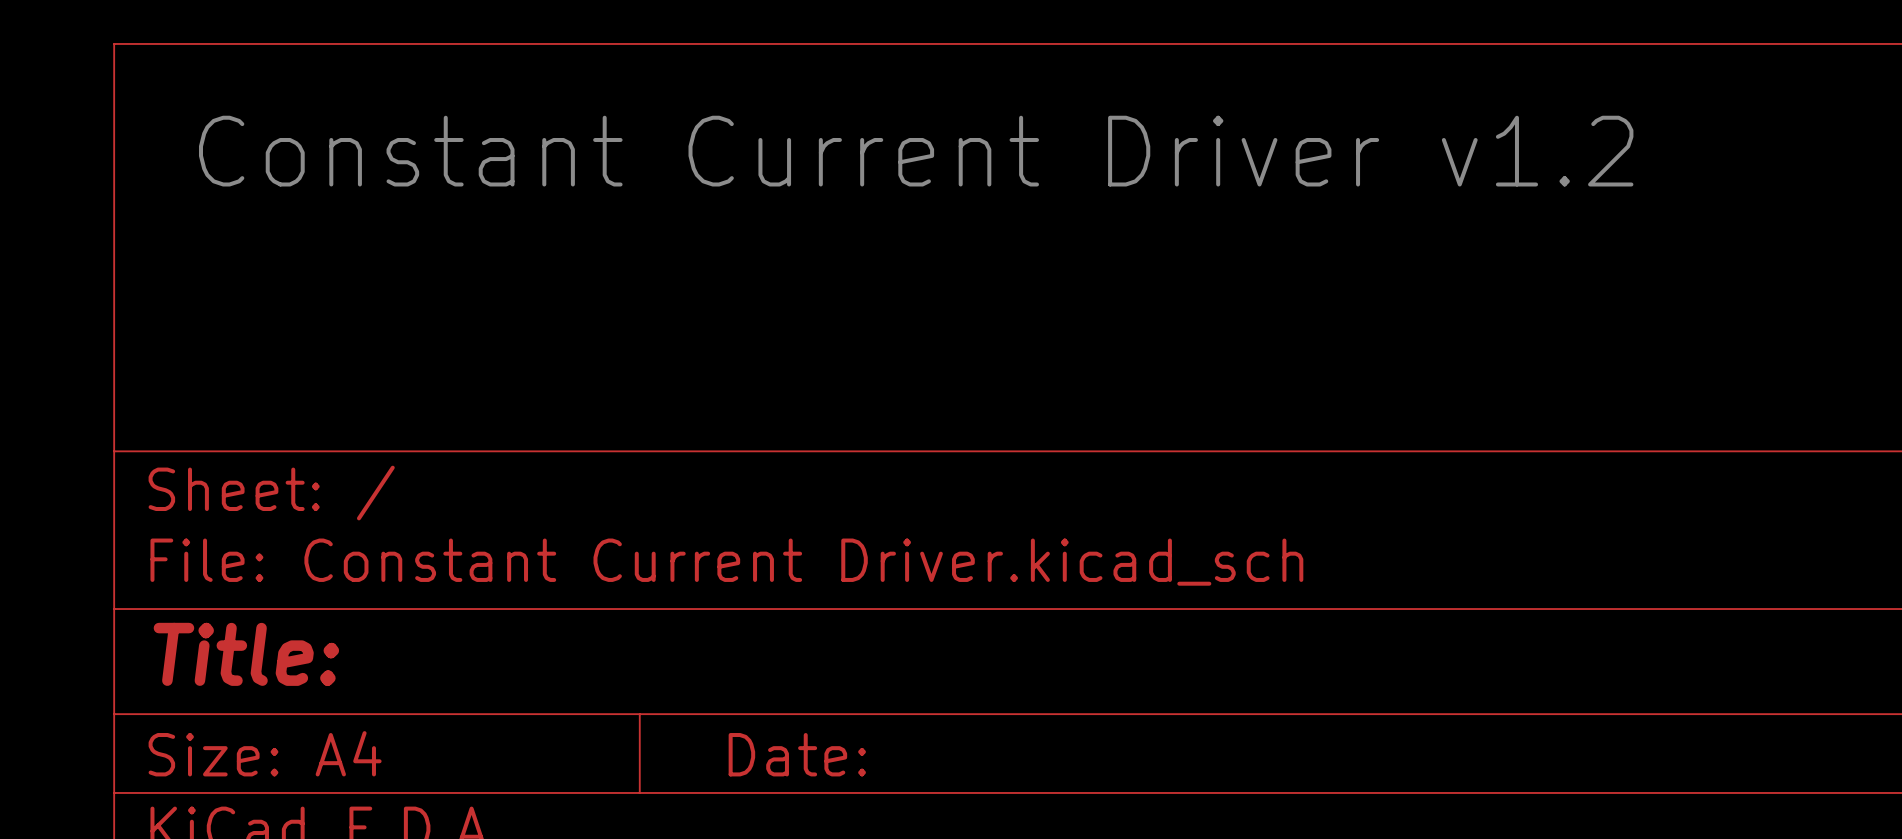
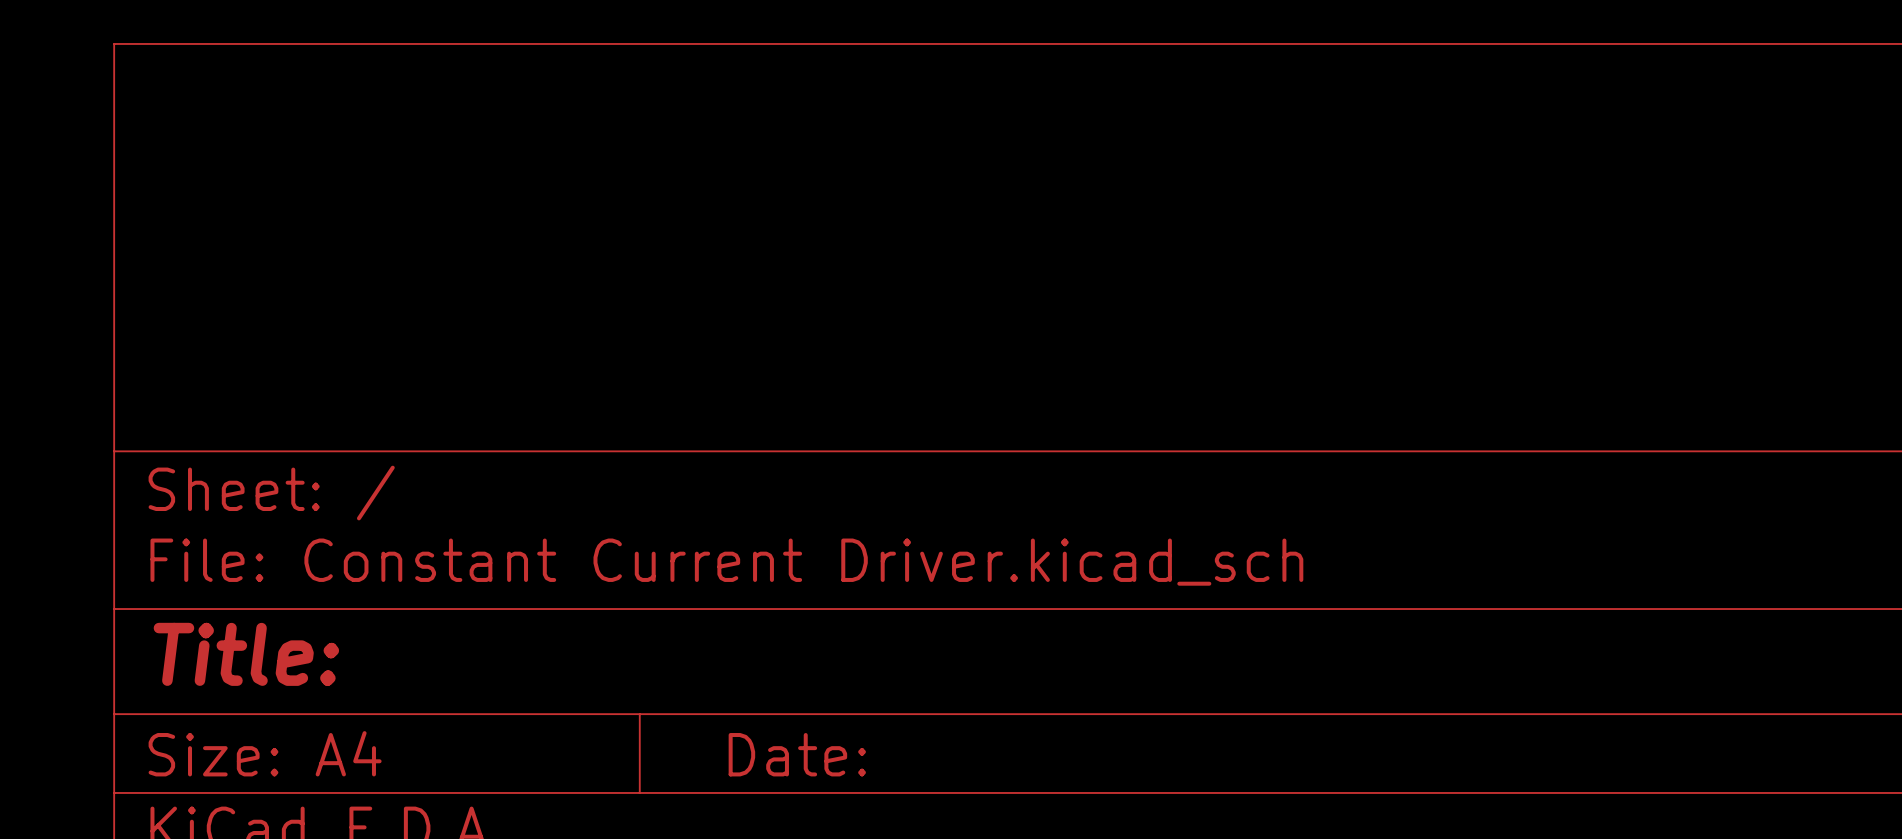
text: Constant Current Driver v1.2 (916, 151) -> none

